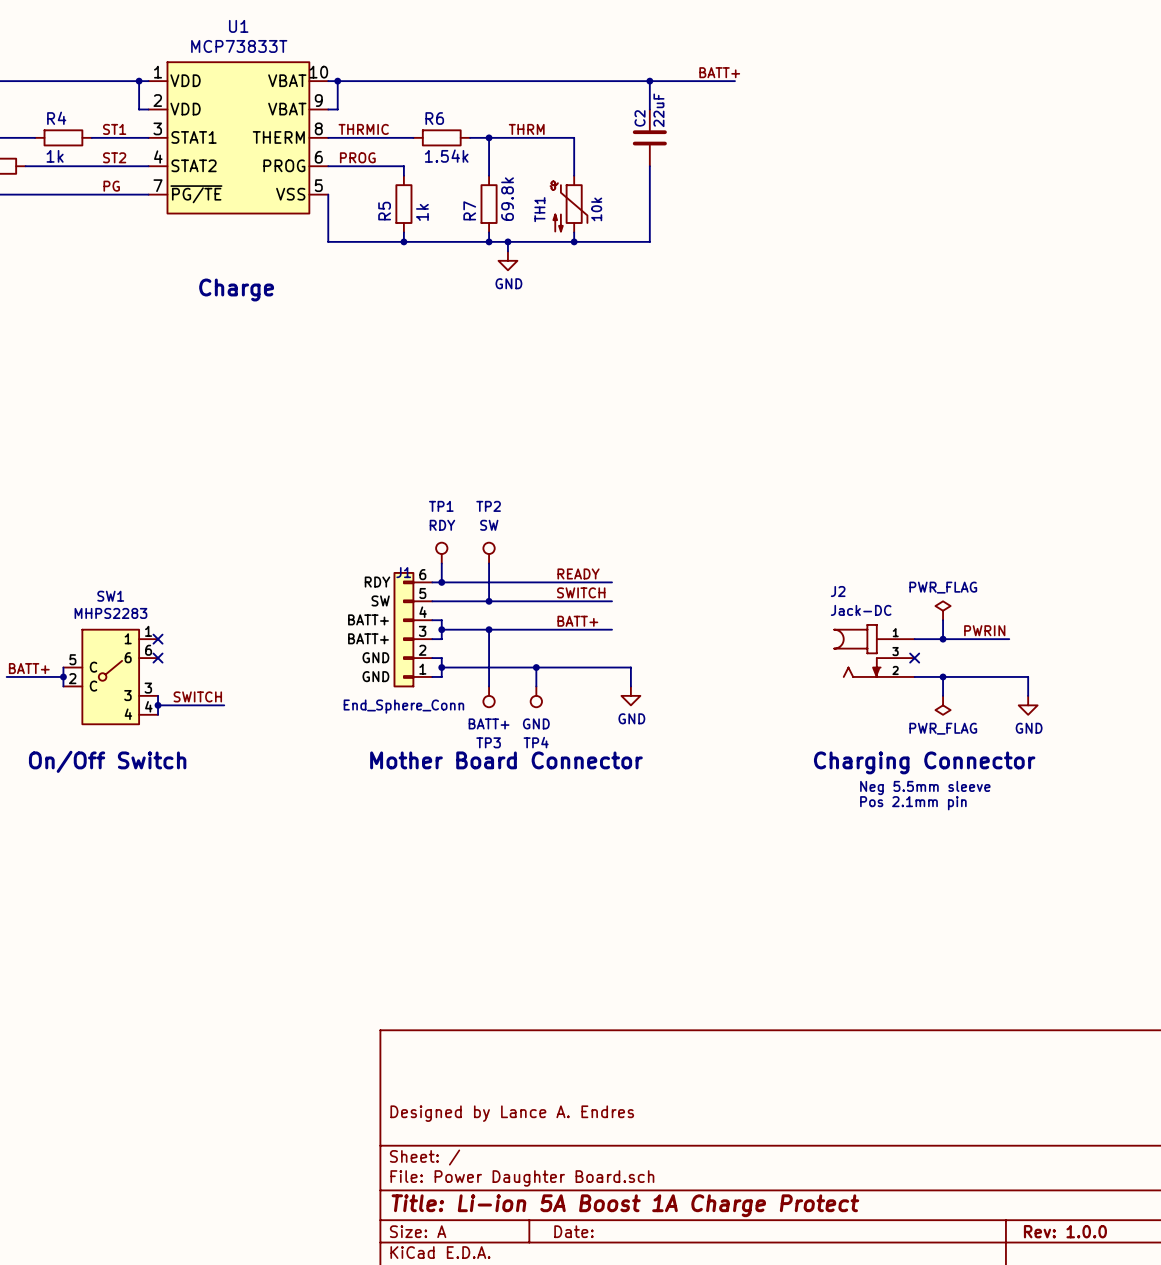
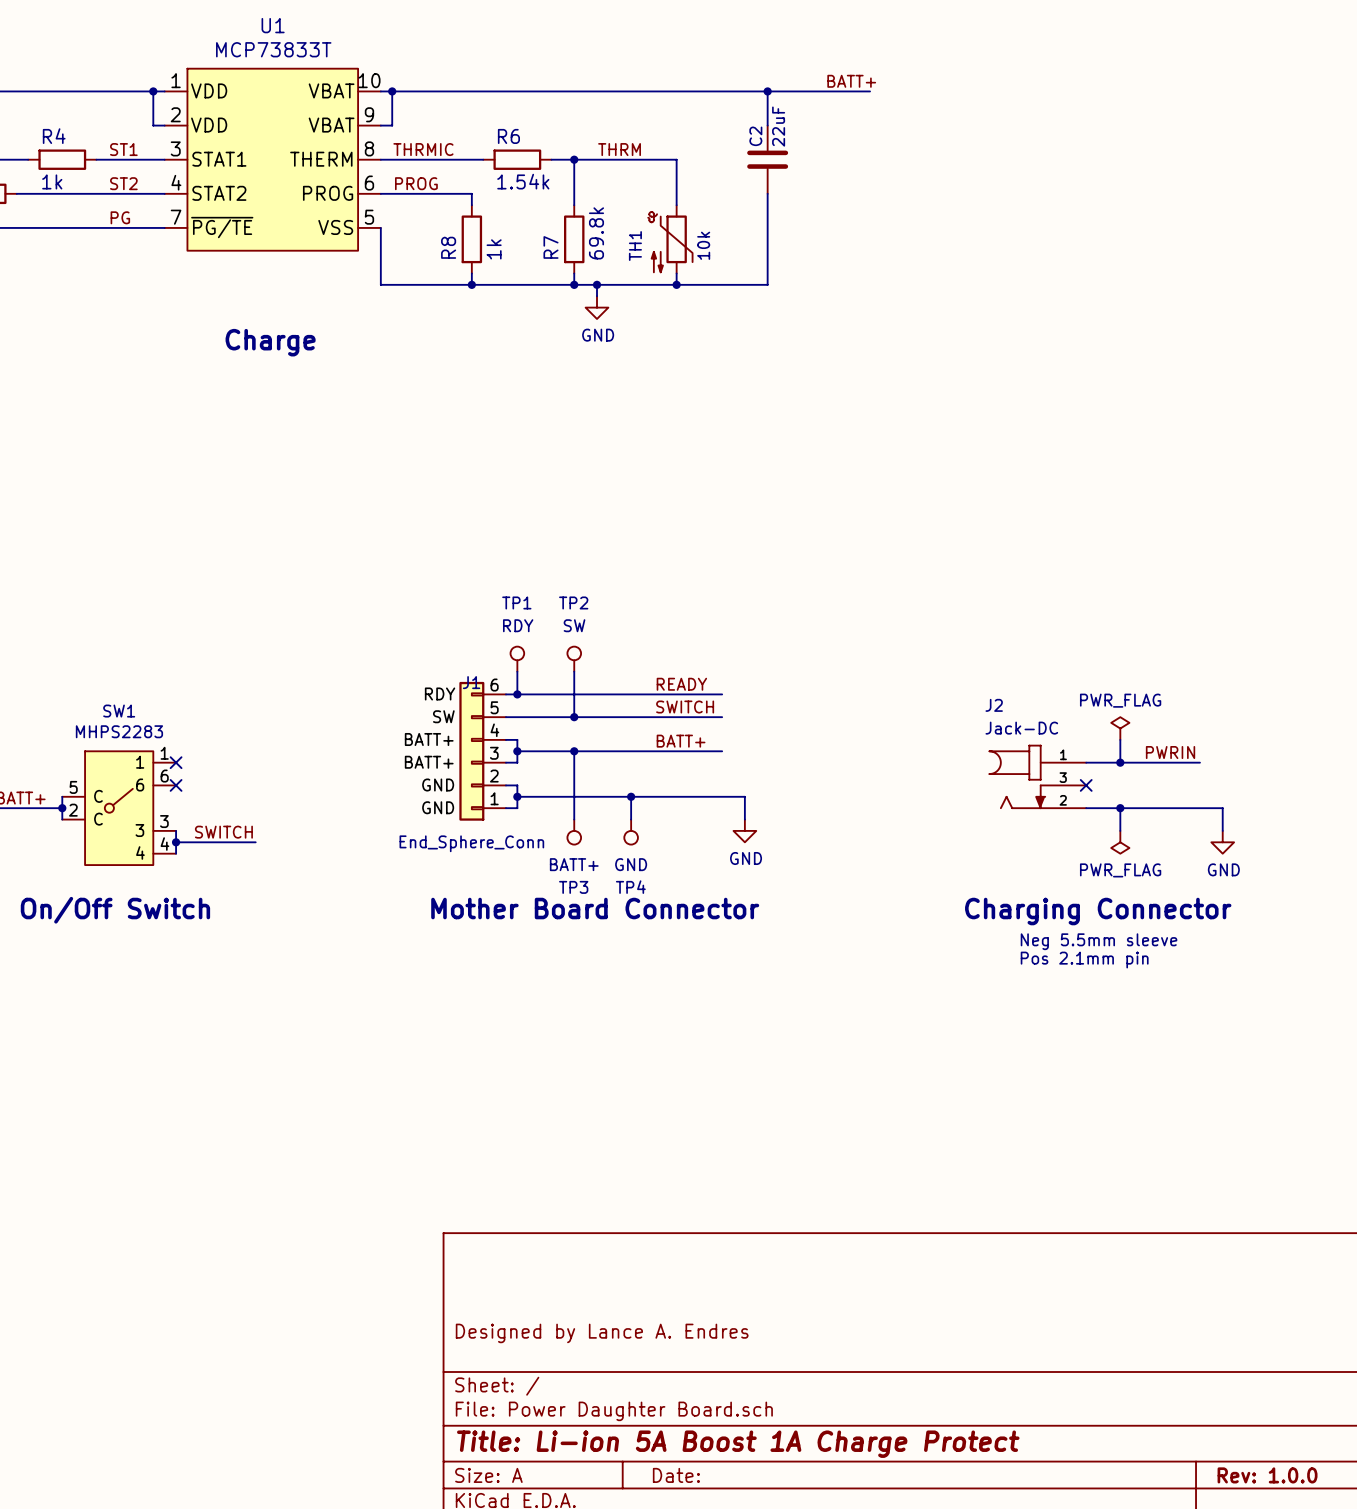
R5 name: R5 (384, 211) -> R8 (448, 247)

